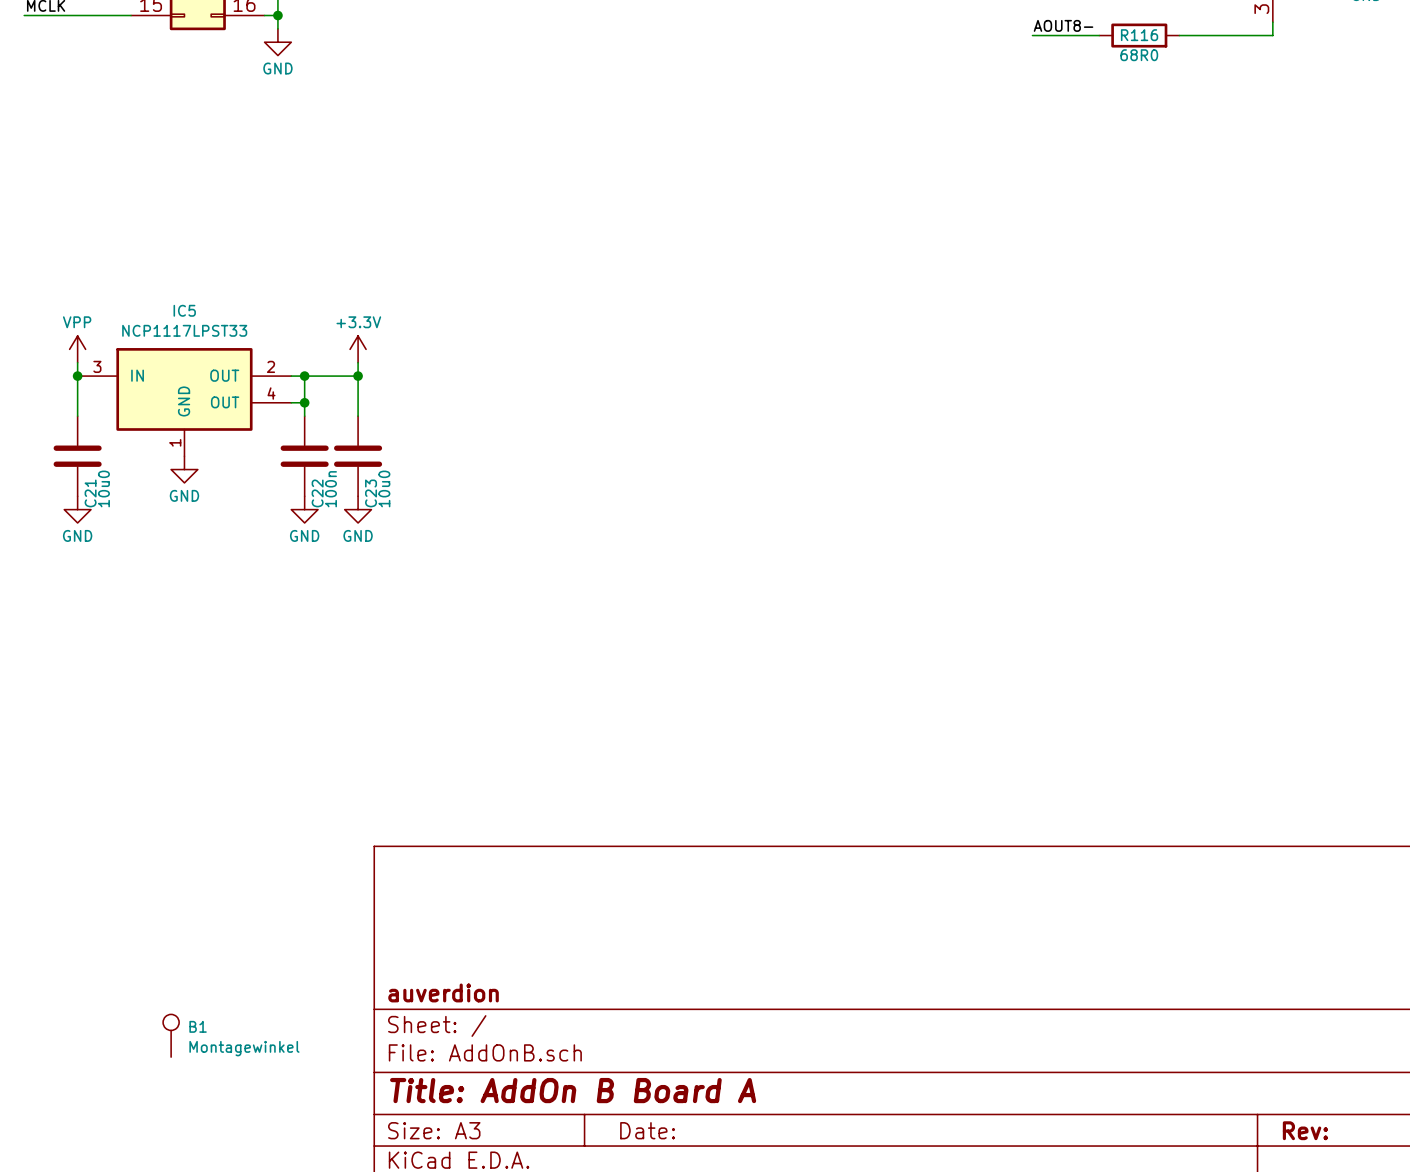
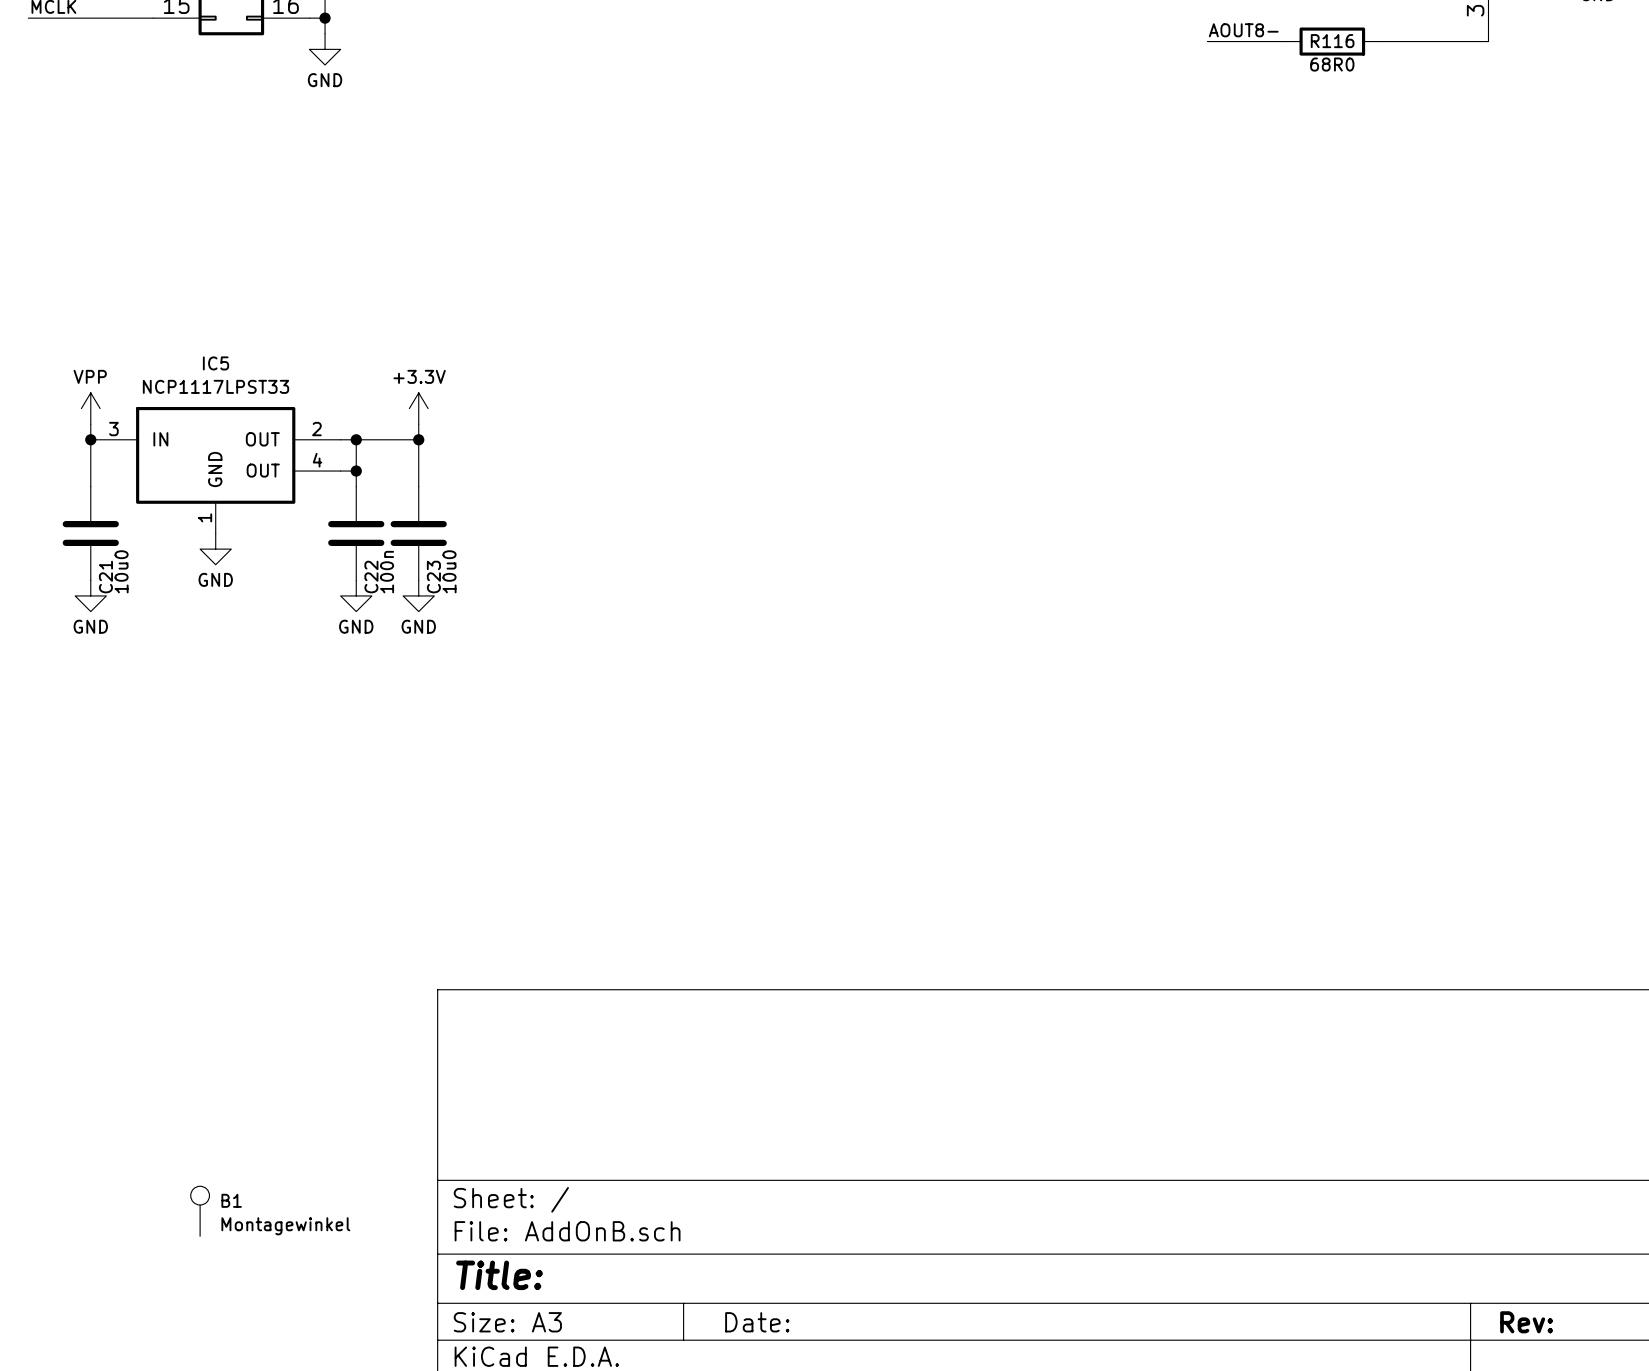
title block: auverdion (443, 992) -> none
title block: Title: AddOn B Board A (573, 1090) -> Title: (499, 1275)

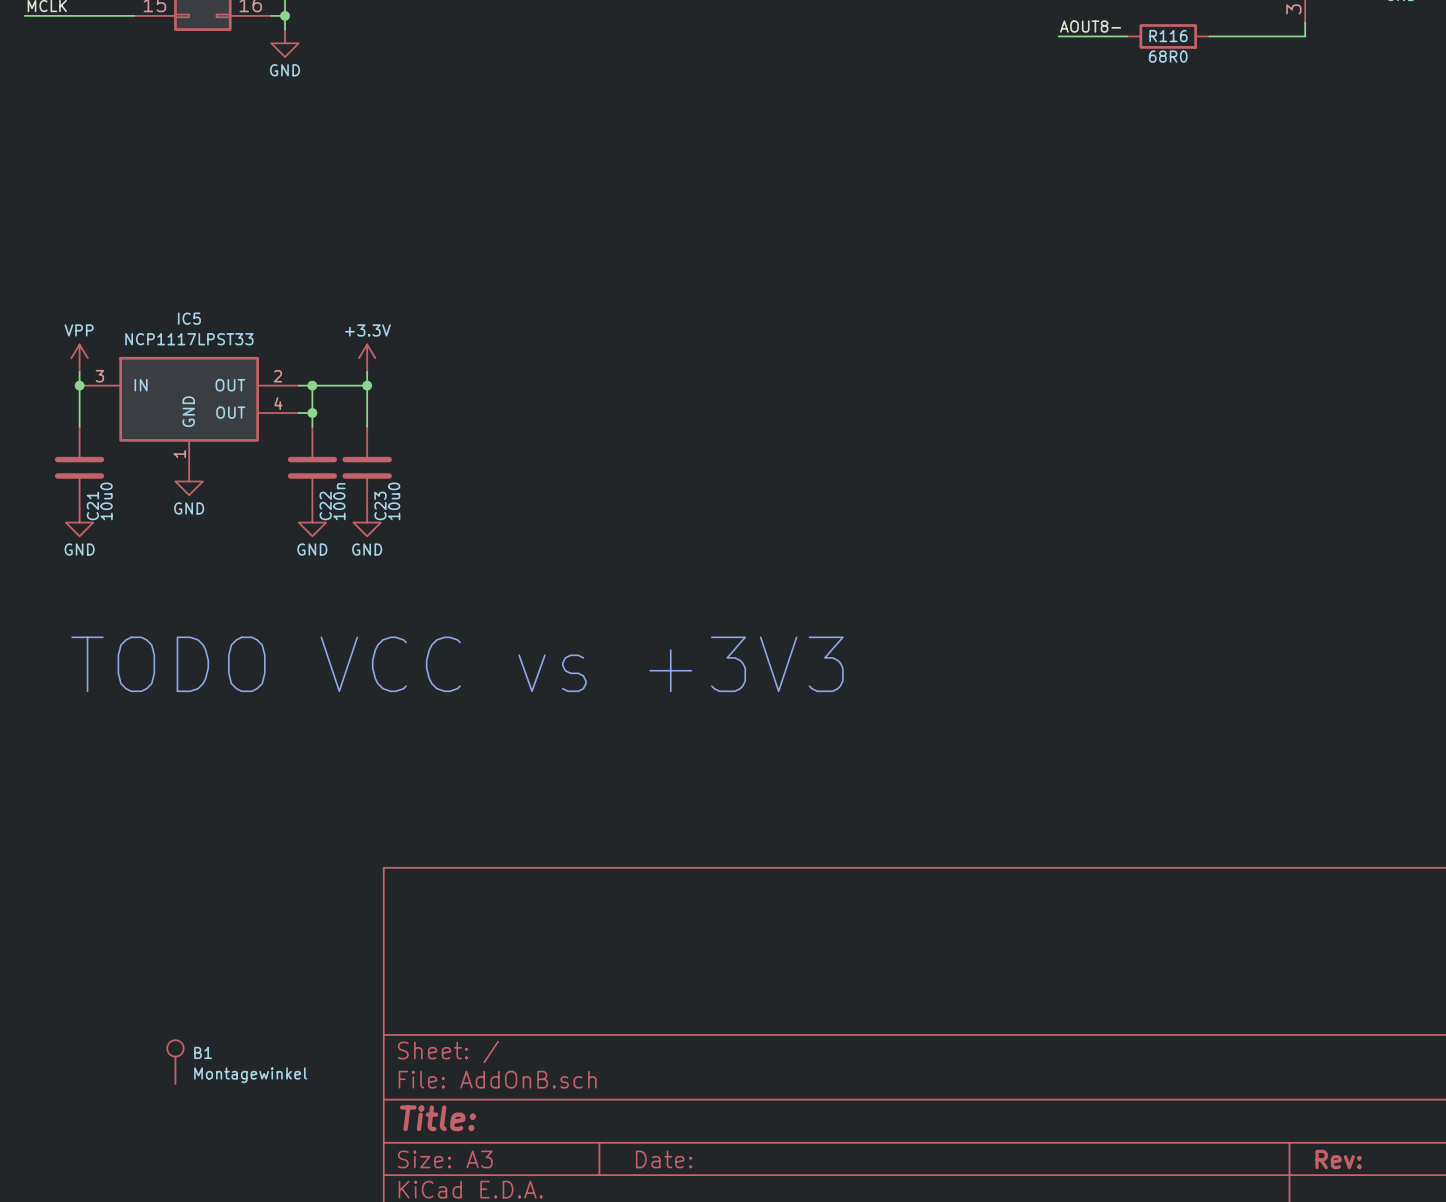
text: none -> TODO VCC vs +3V3 (457, 664)

